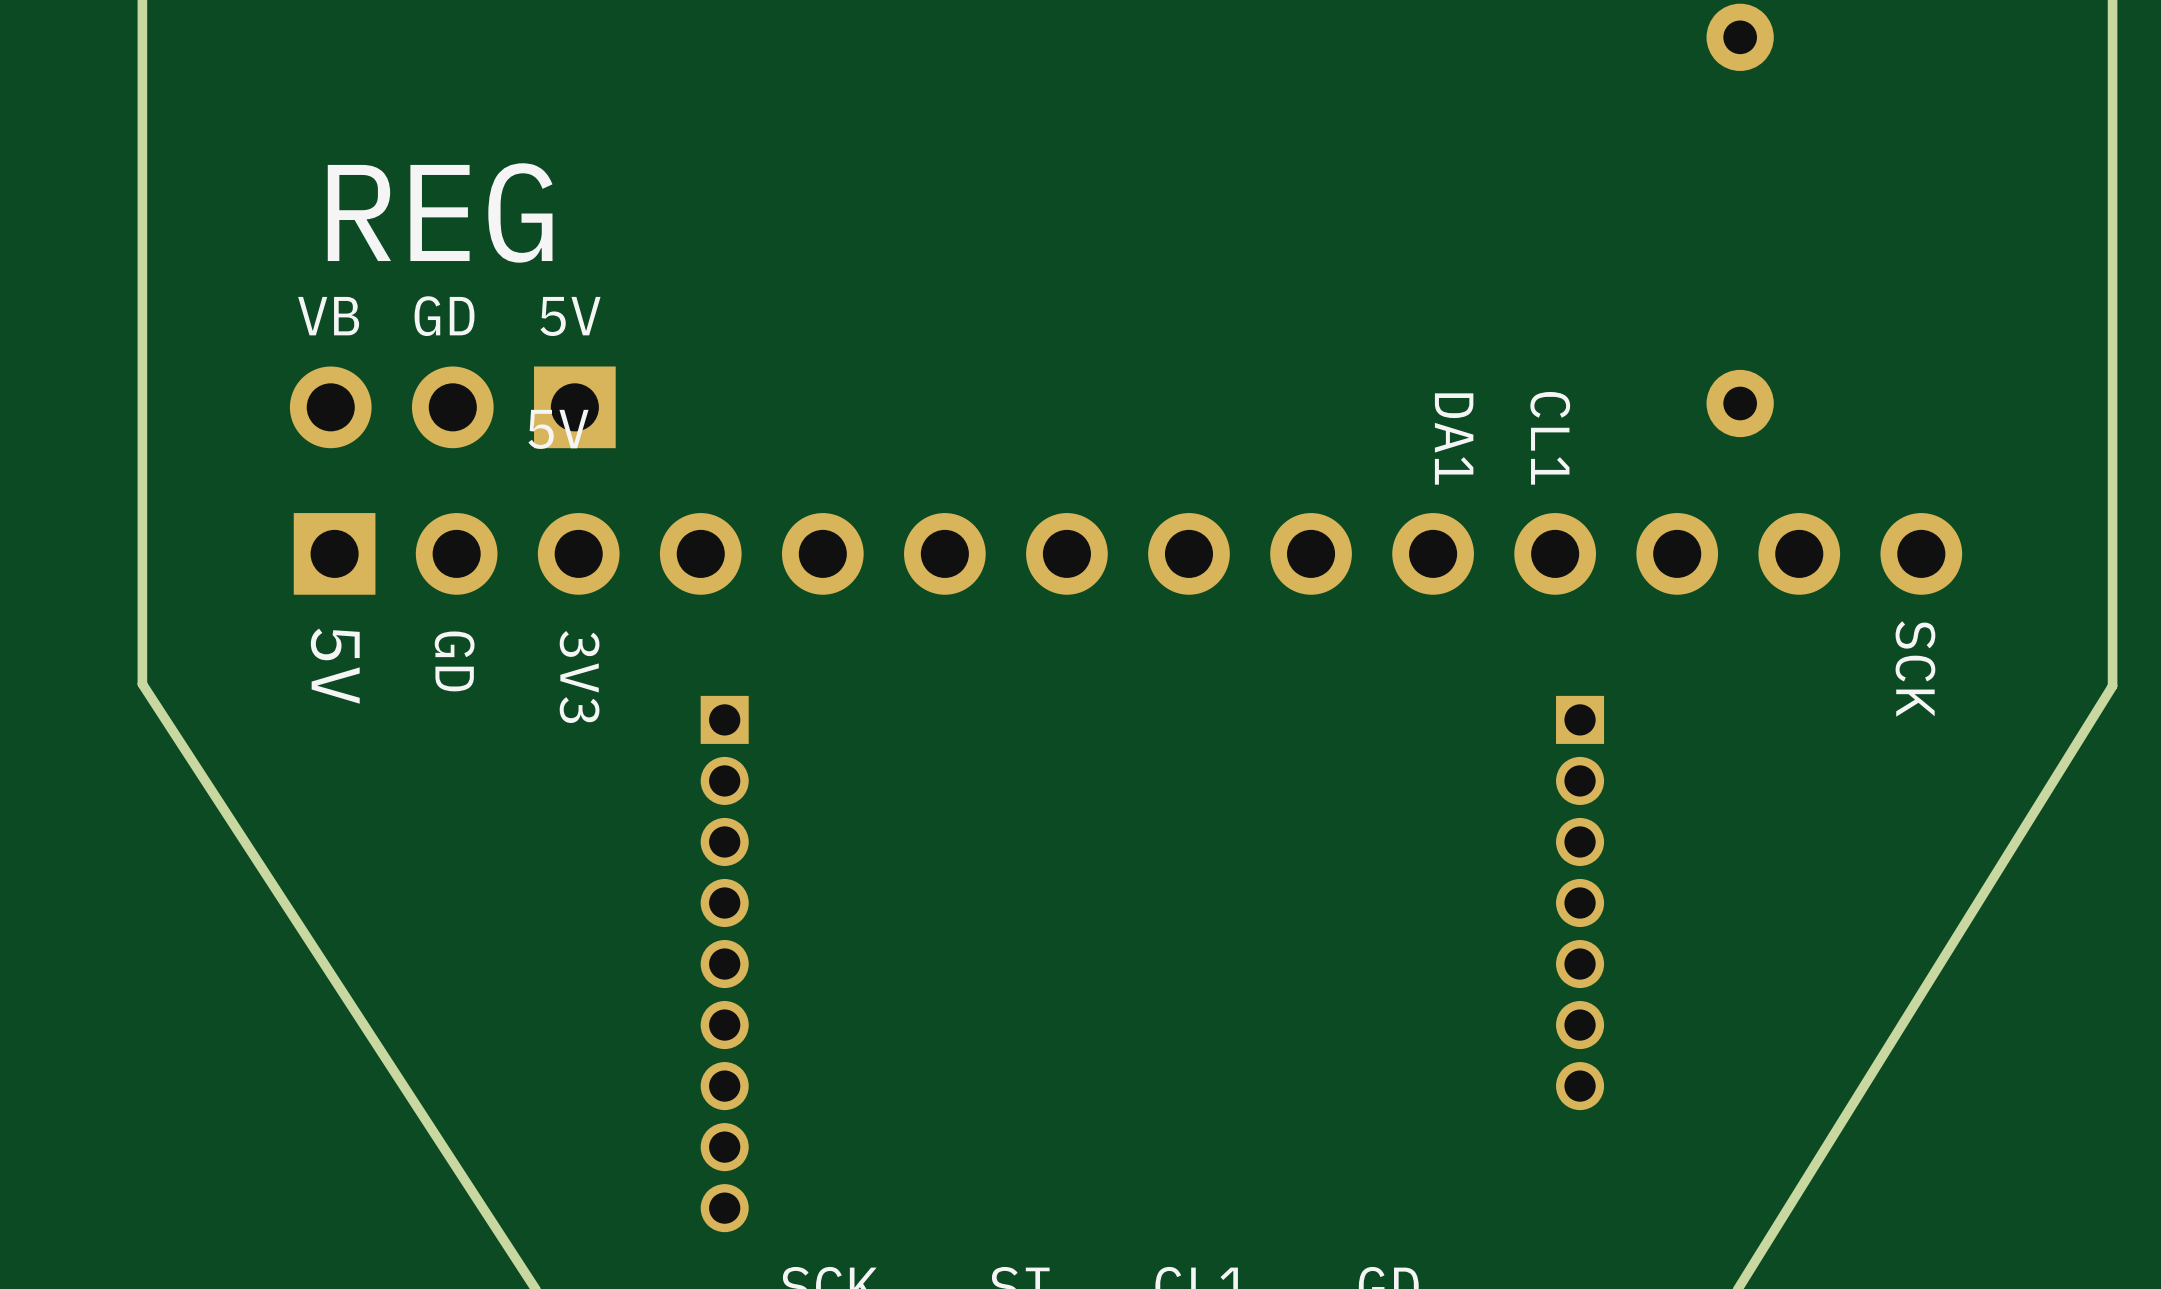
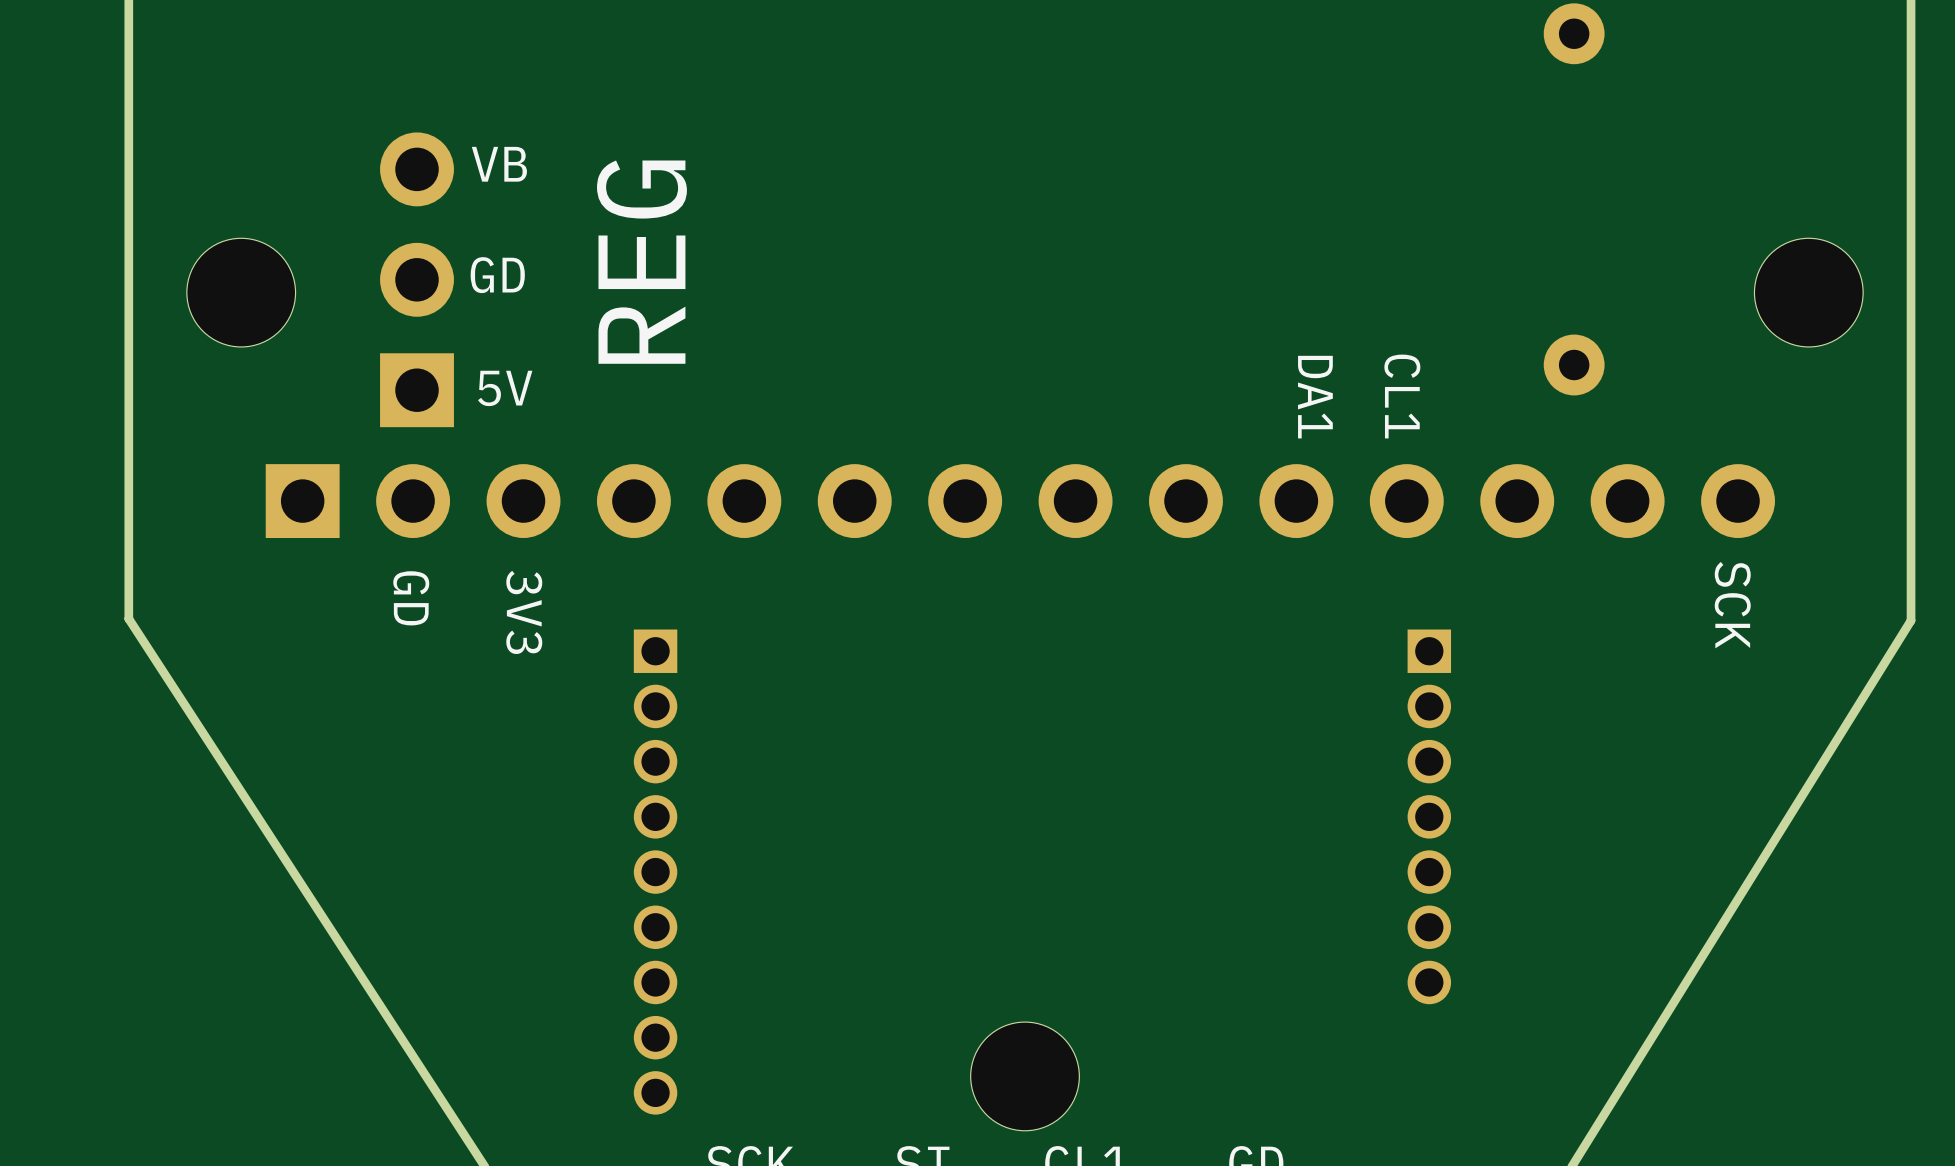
text rotation: 0° (440, 212) -> 90° counterclockwise (641, 262)
text position: VB (328, 316) -> VB (499, 164)
text: GD (444, 316) -> none
text: 5V (570, 316) -> GD (497, 275)
part: none -> (241, 292)
part: none -> (1808, 292)
part rotation: 0° (452, 407) -> 90° clockwise (417, 279)
text: 5V (335, 666) -> none
part: none -> (1025, 1076)

